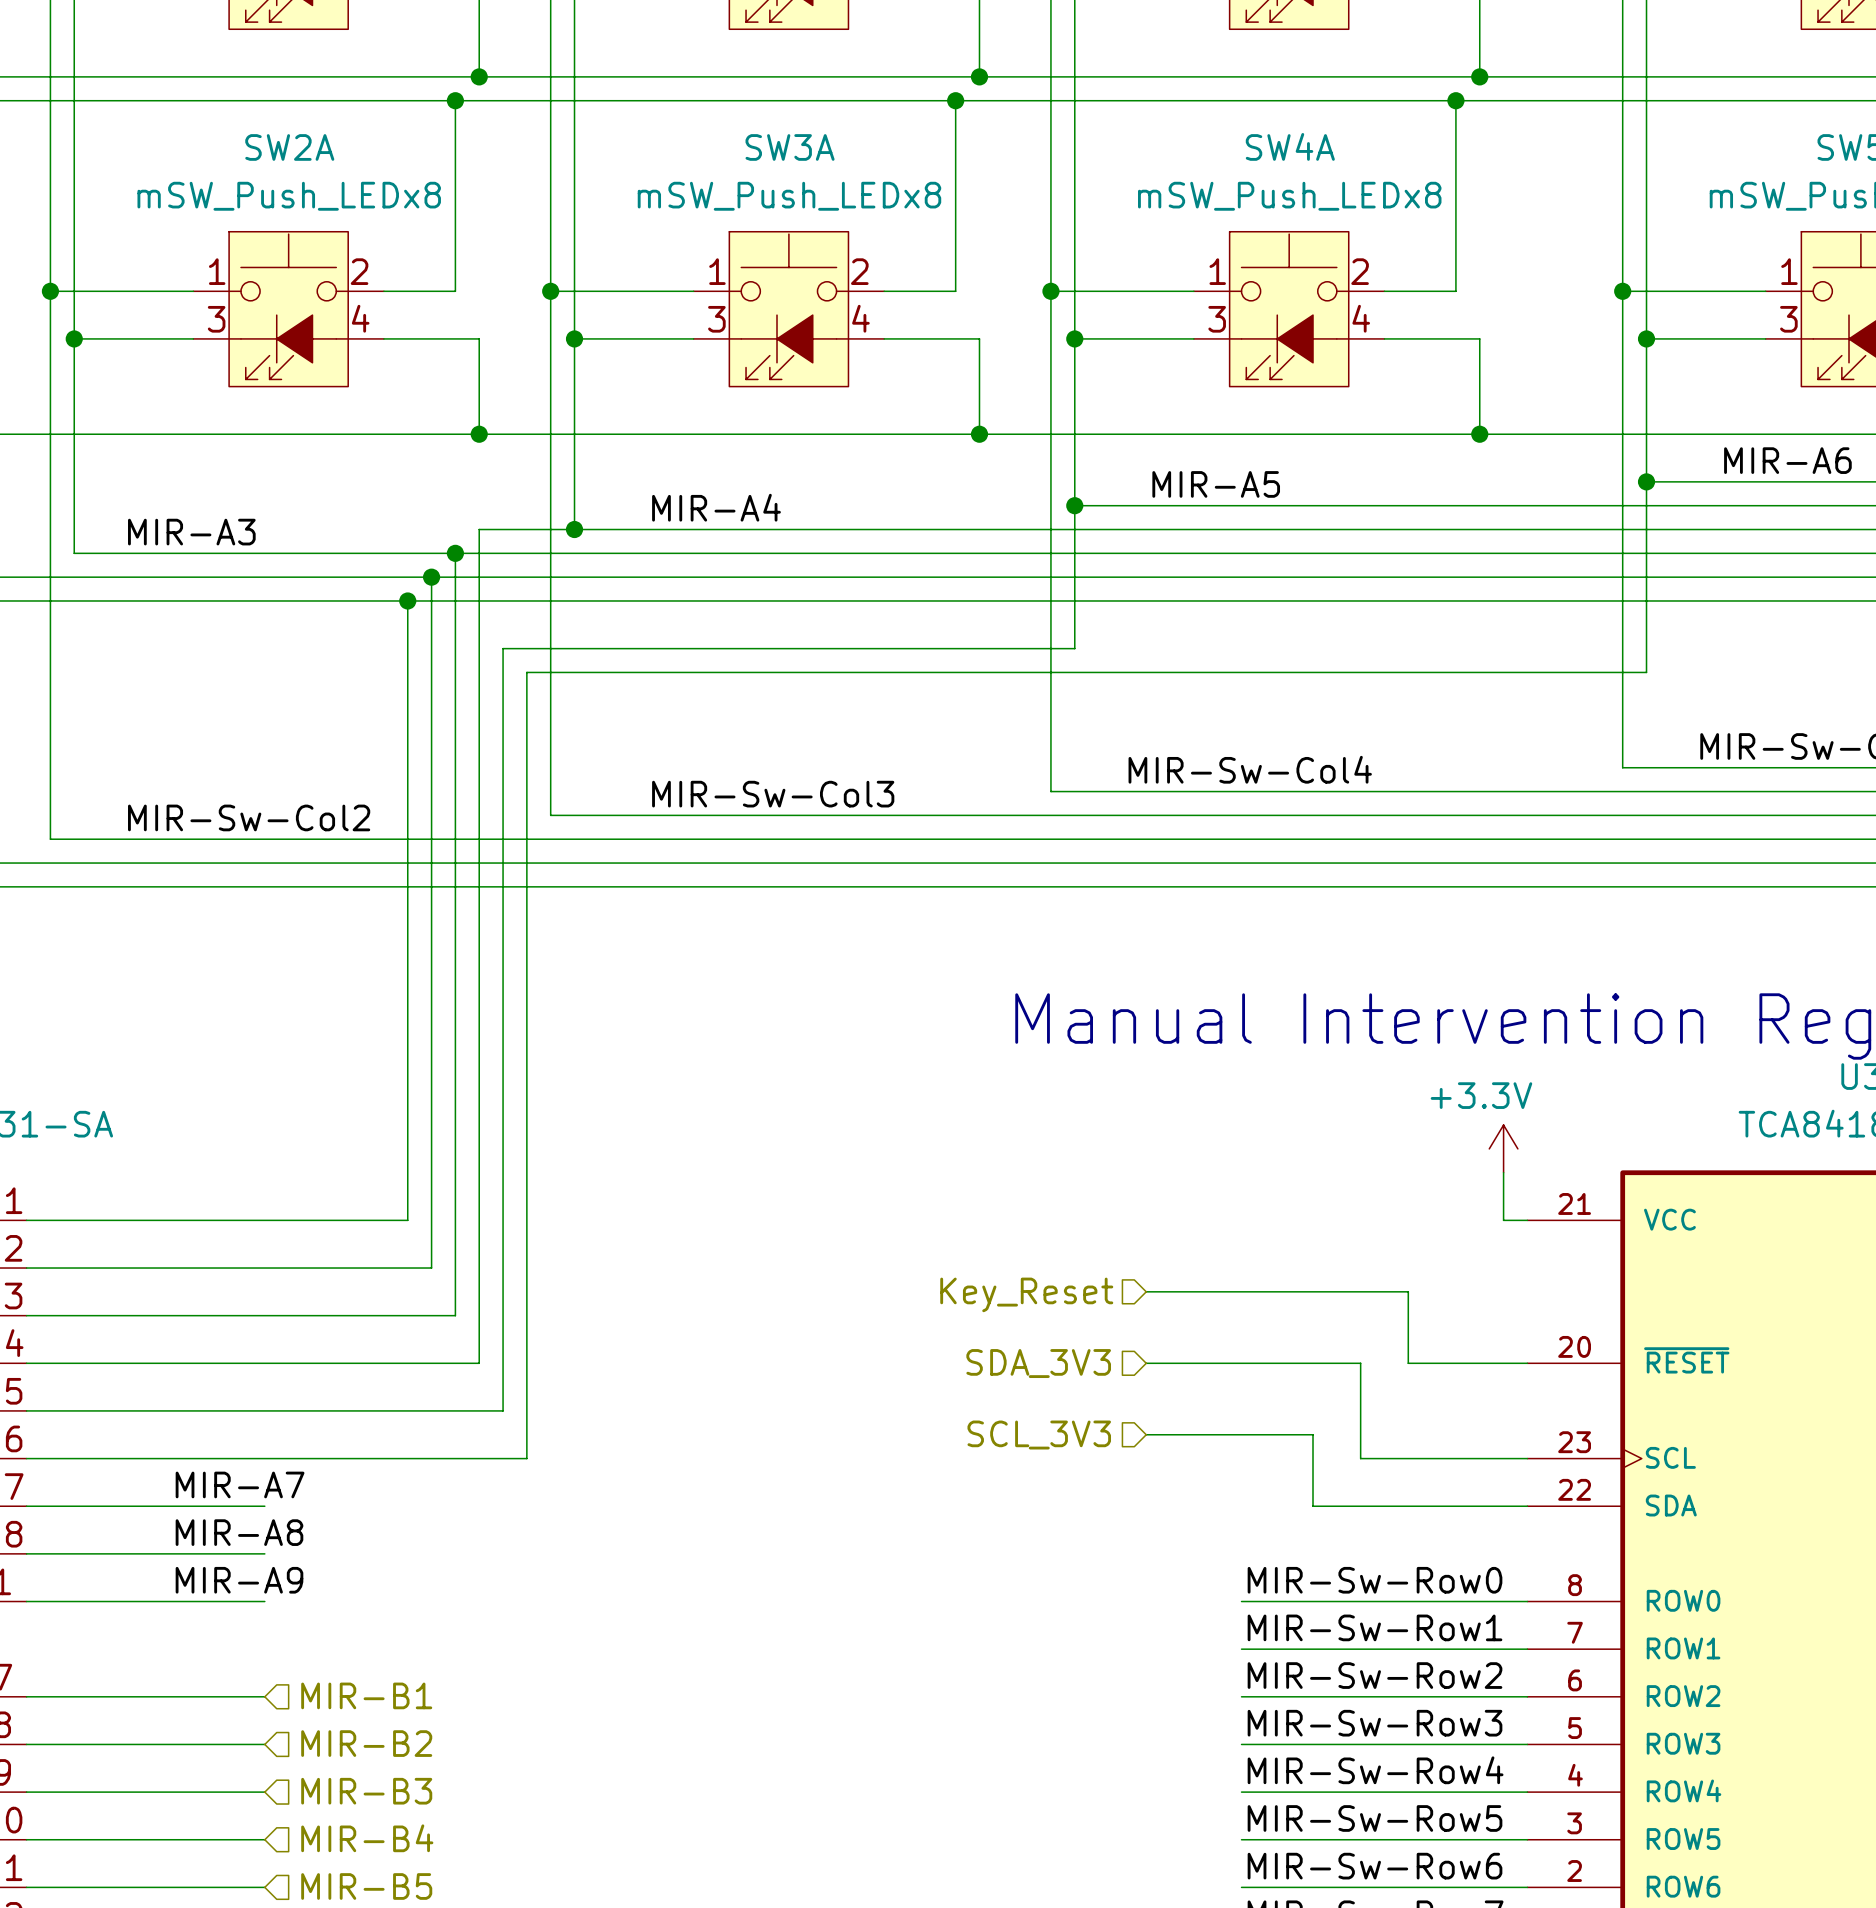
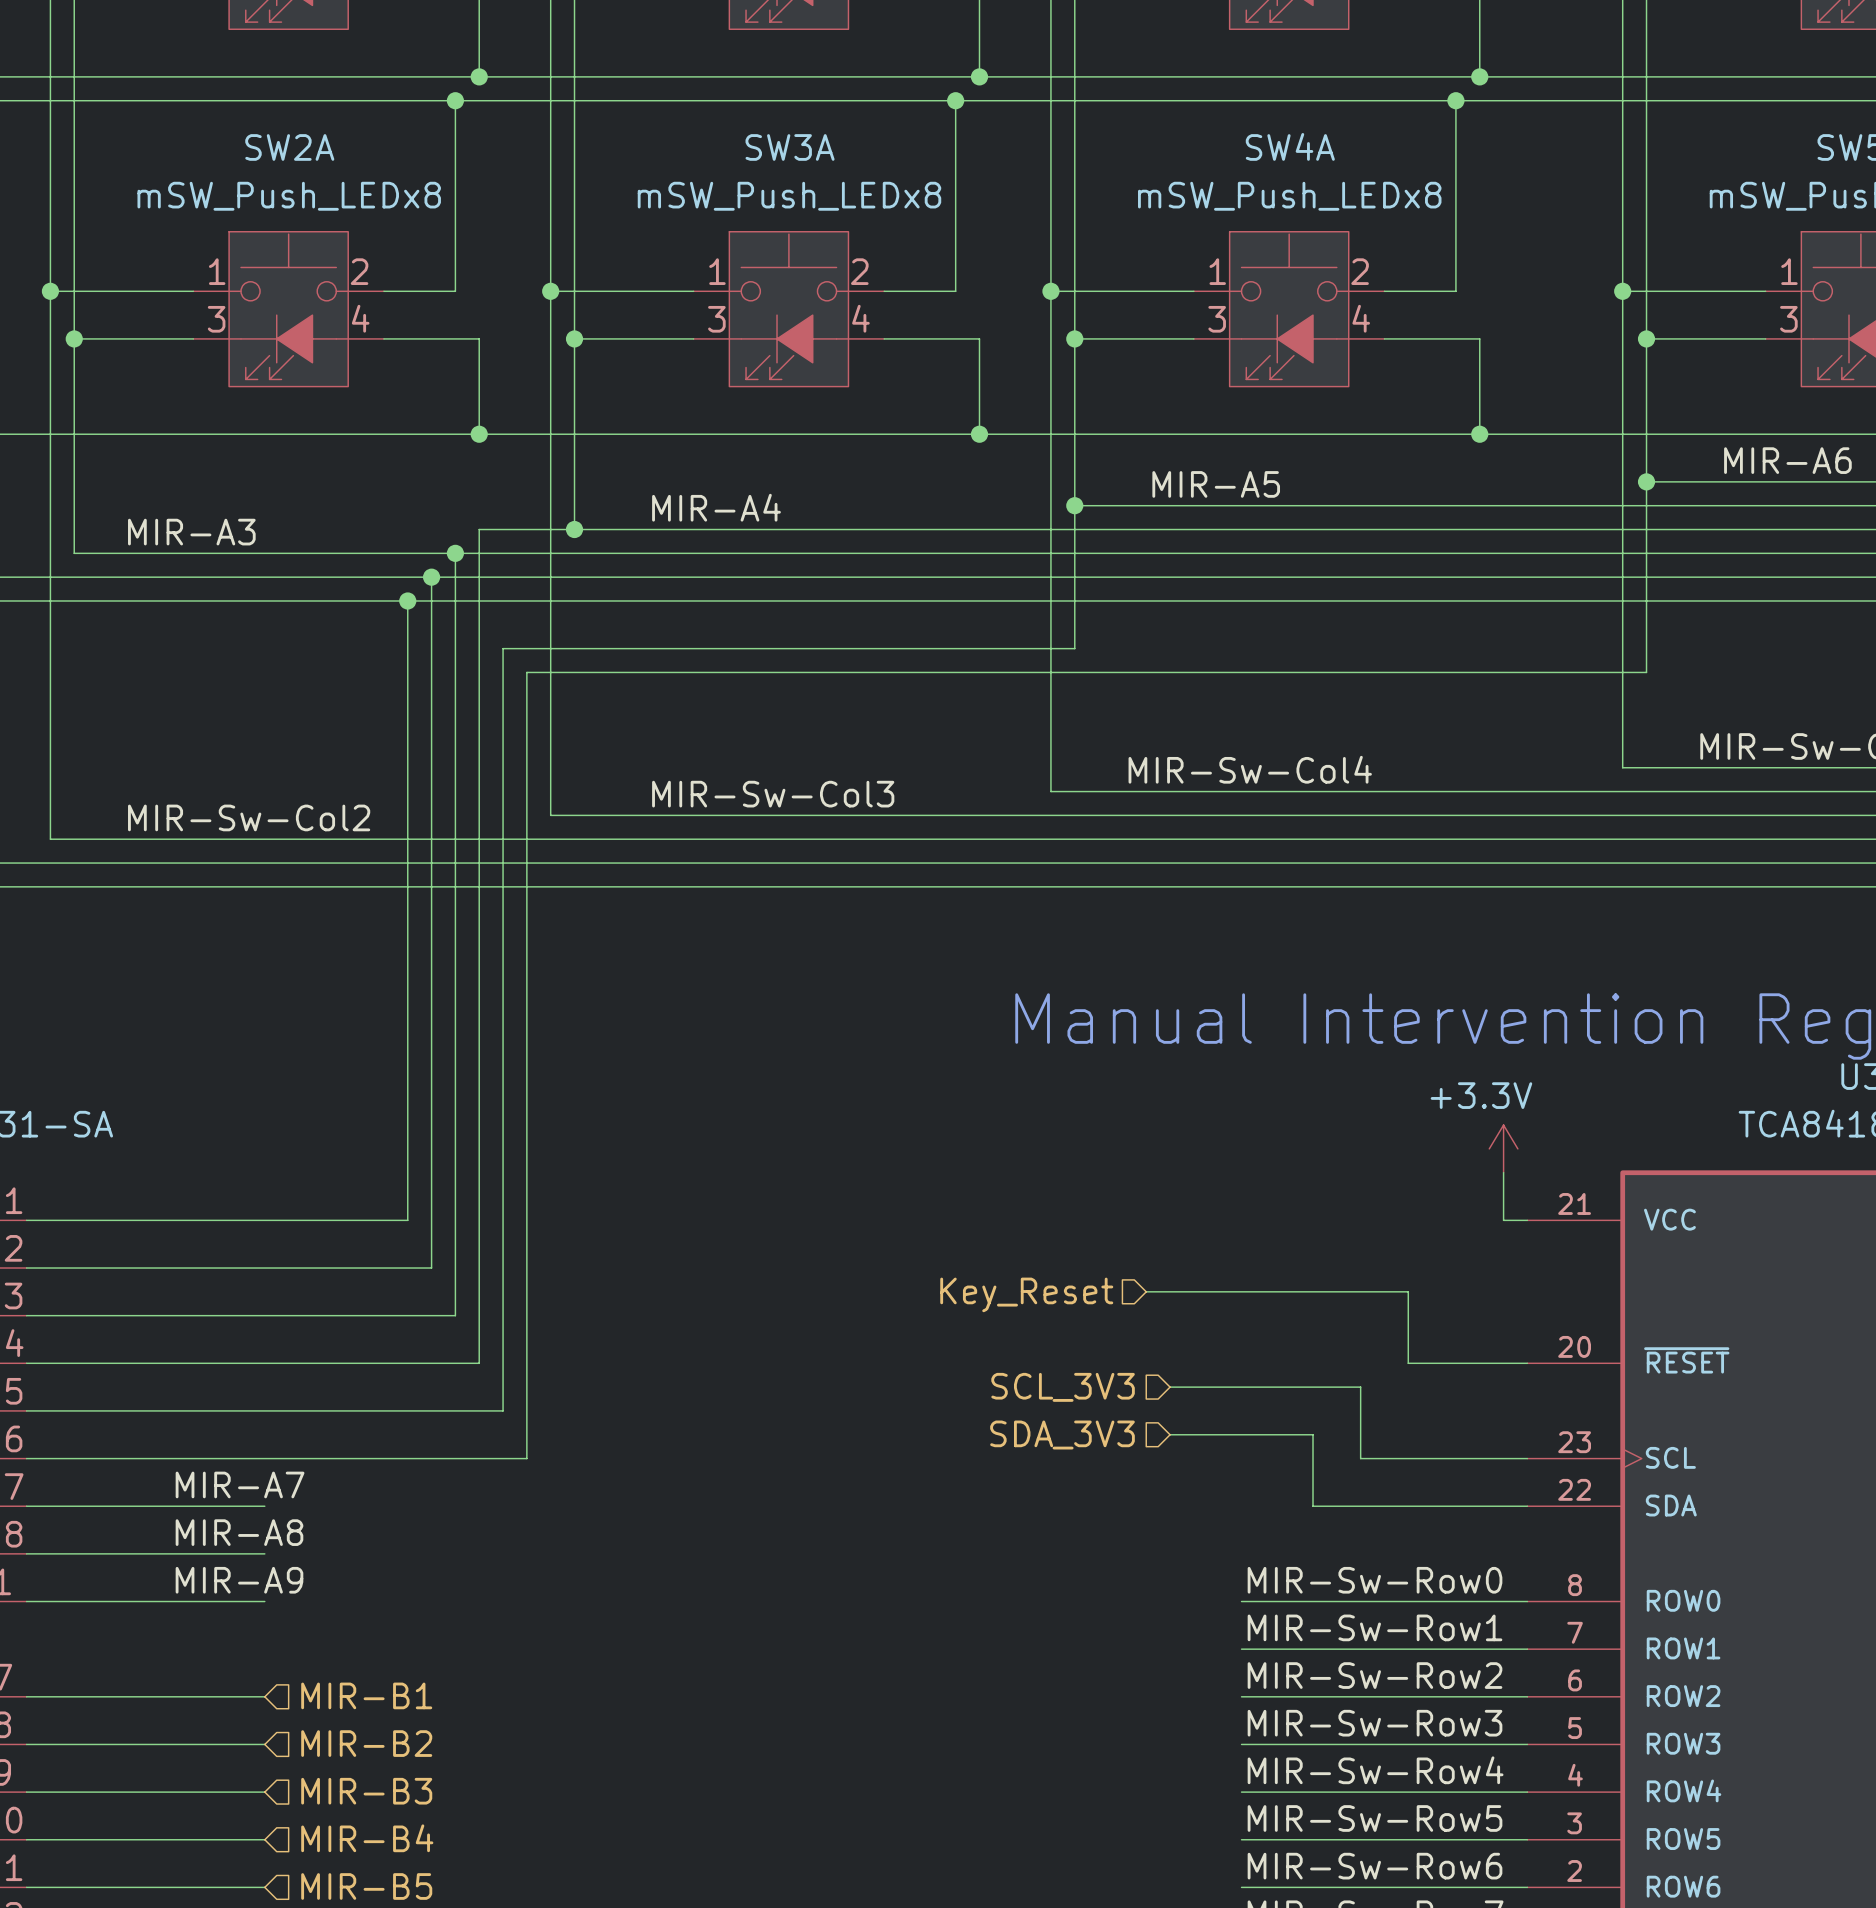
hierarchical label position: SDA_3V3 (1038, 1363) -> SDA_3V3 (1062, 1435)
wire: (1146, 1363) (1360, 1363) (1360, 1387) -> (1170, 1387) (1360, 1387)
wire: (1146, 1434) (1170, 1434) -> none
hierarchical label position: SCL_3V3 (1039, 1435) -> SCL_3V3 (1063, 1387)

